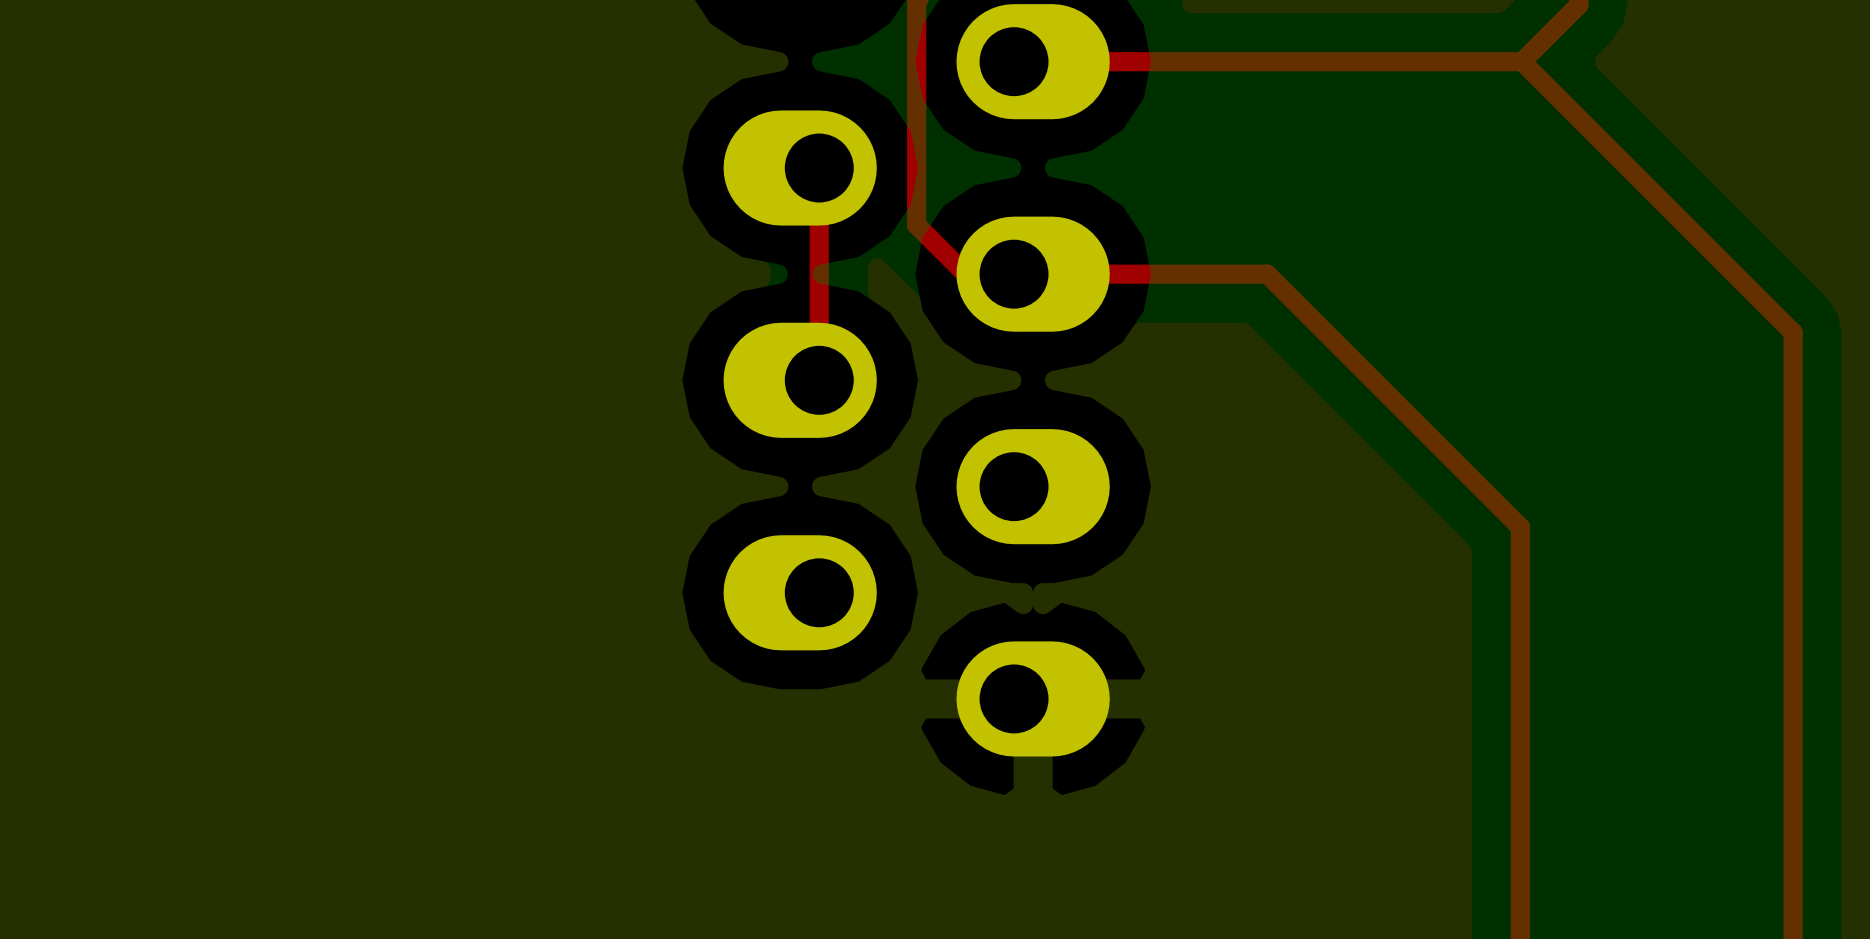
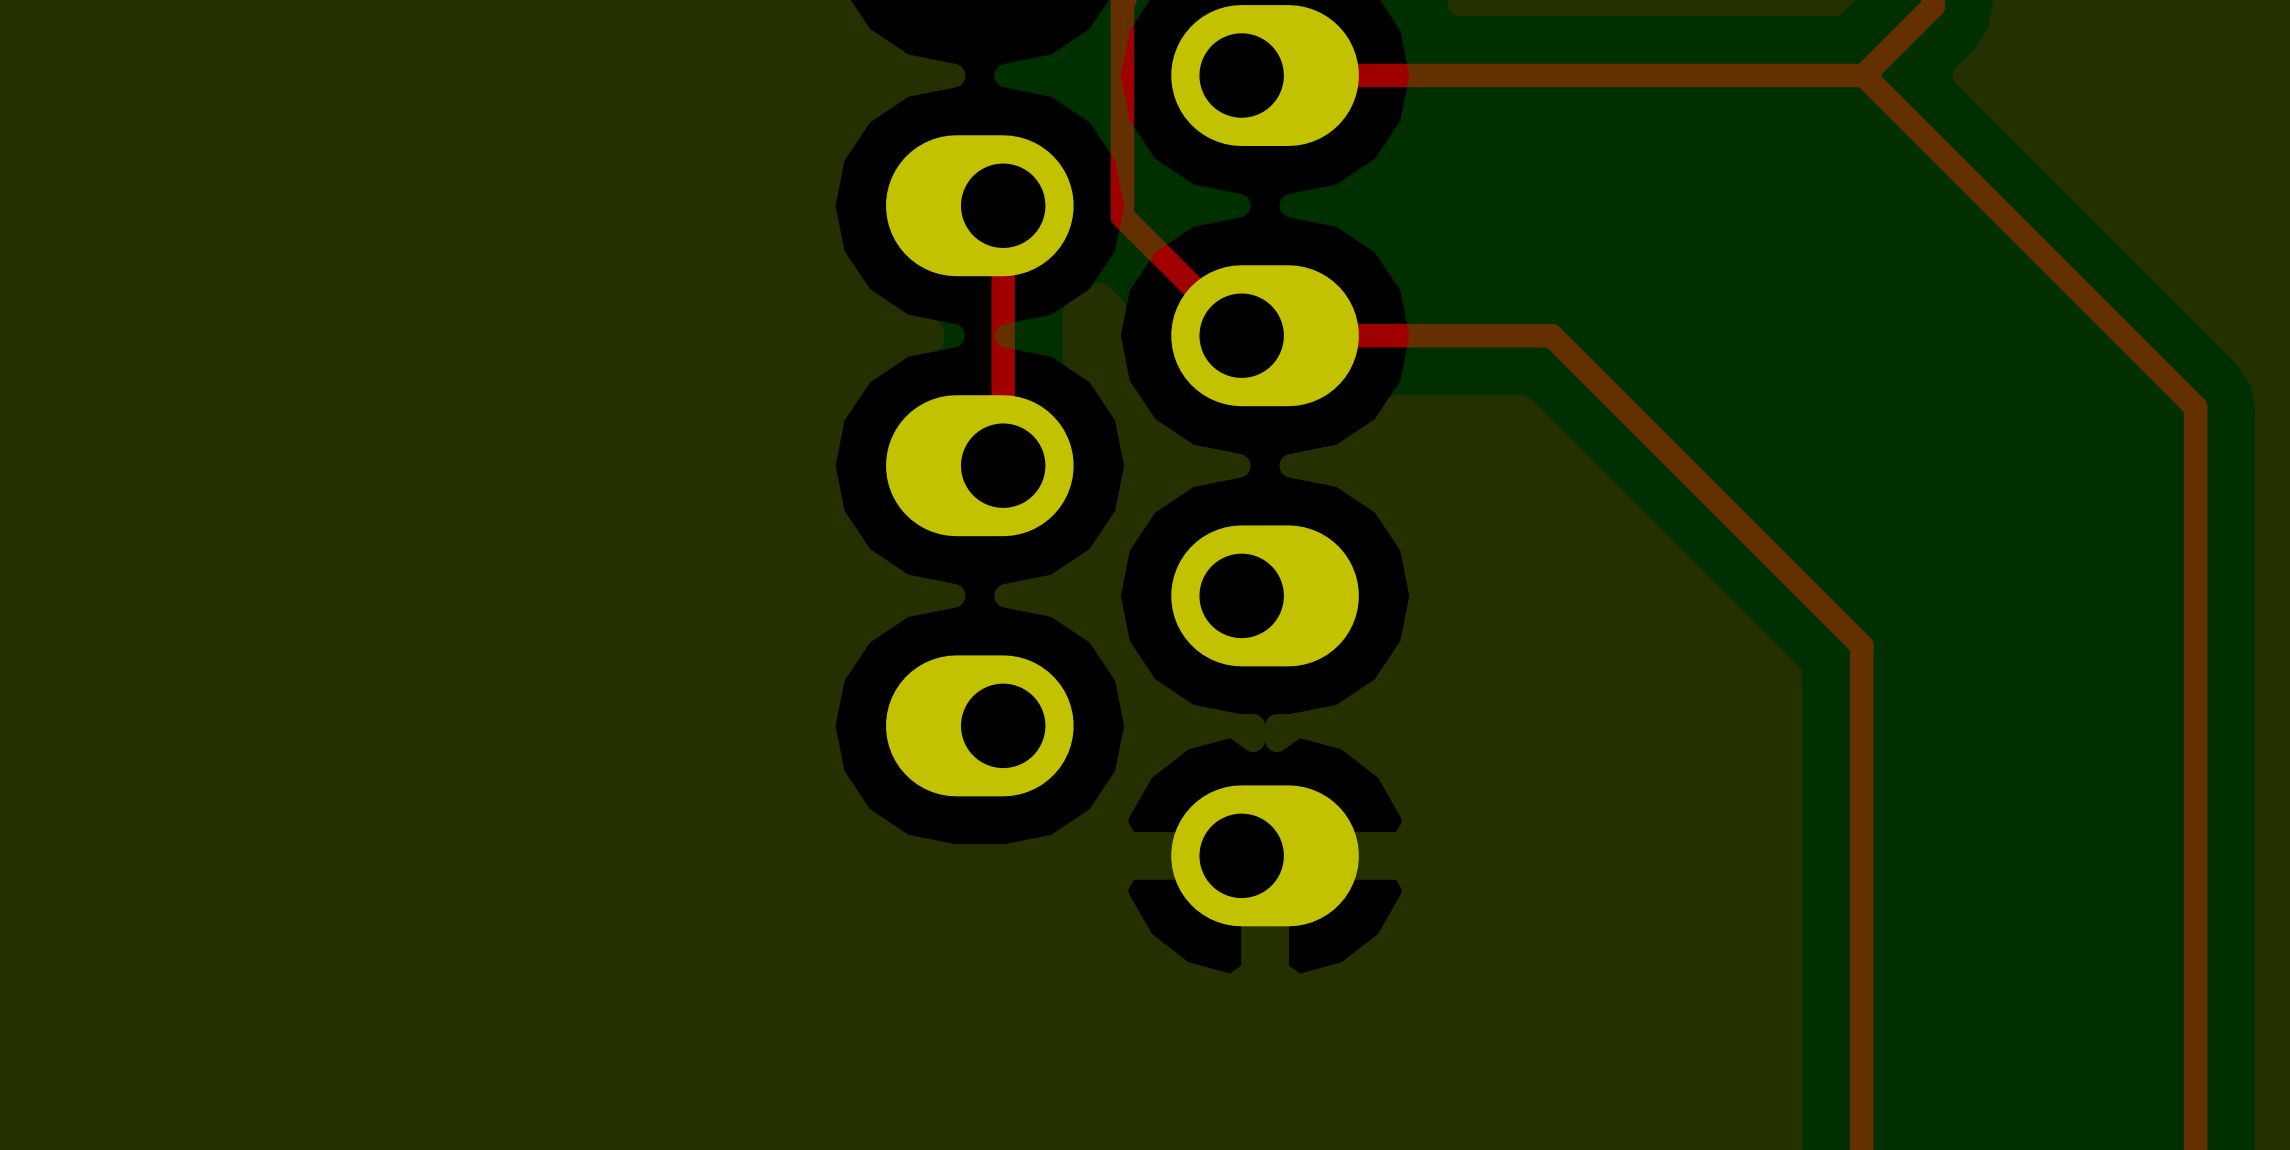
top track: (916, 176) (916, 225) (965, 274) (1014, 274) -> (1122, 216) (1241, 335)

